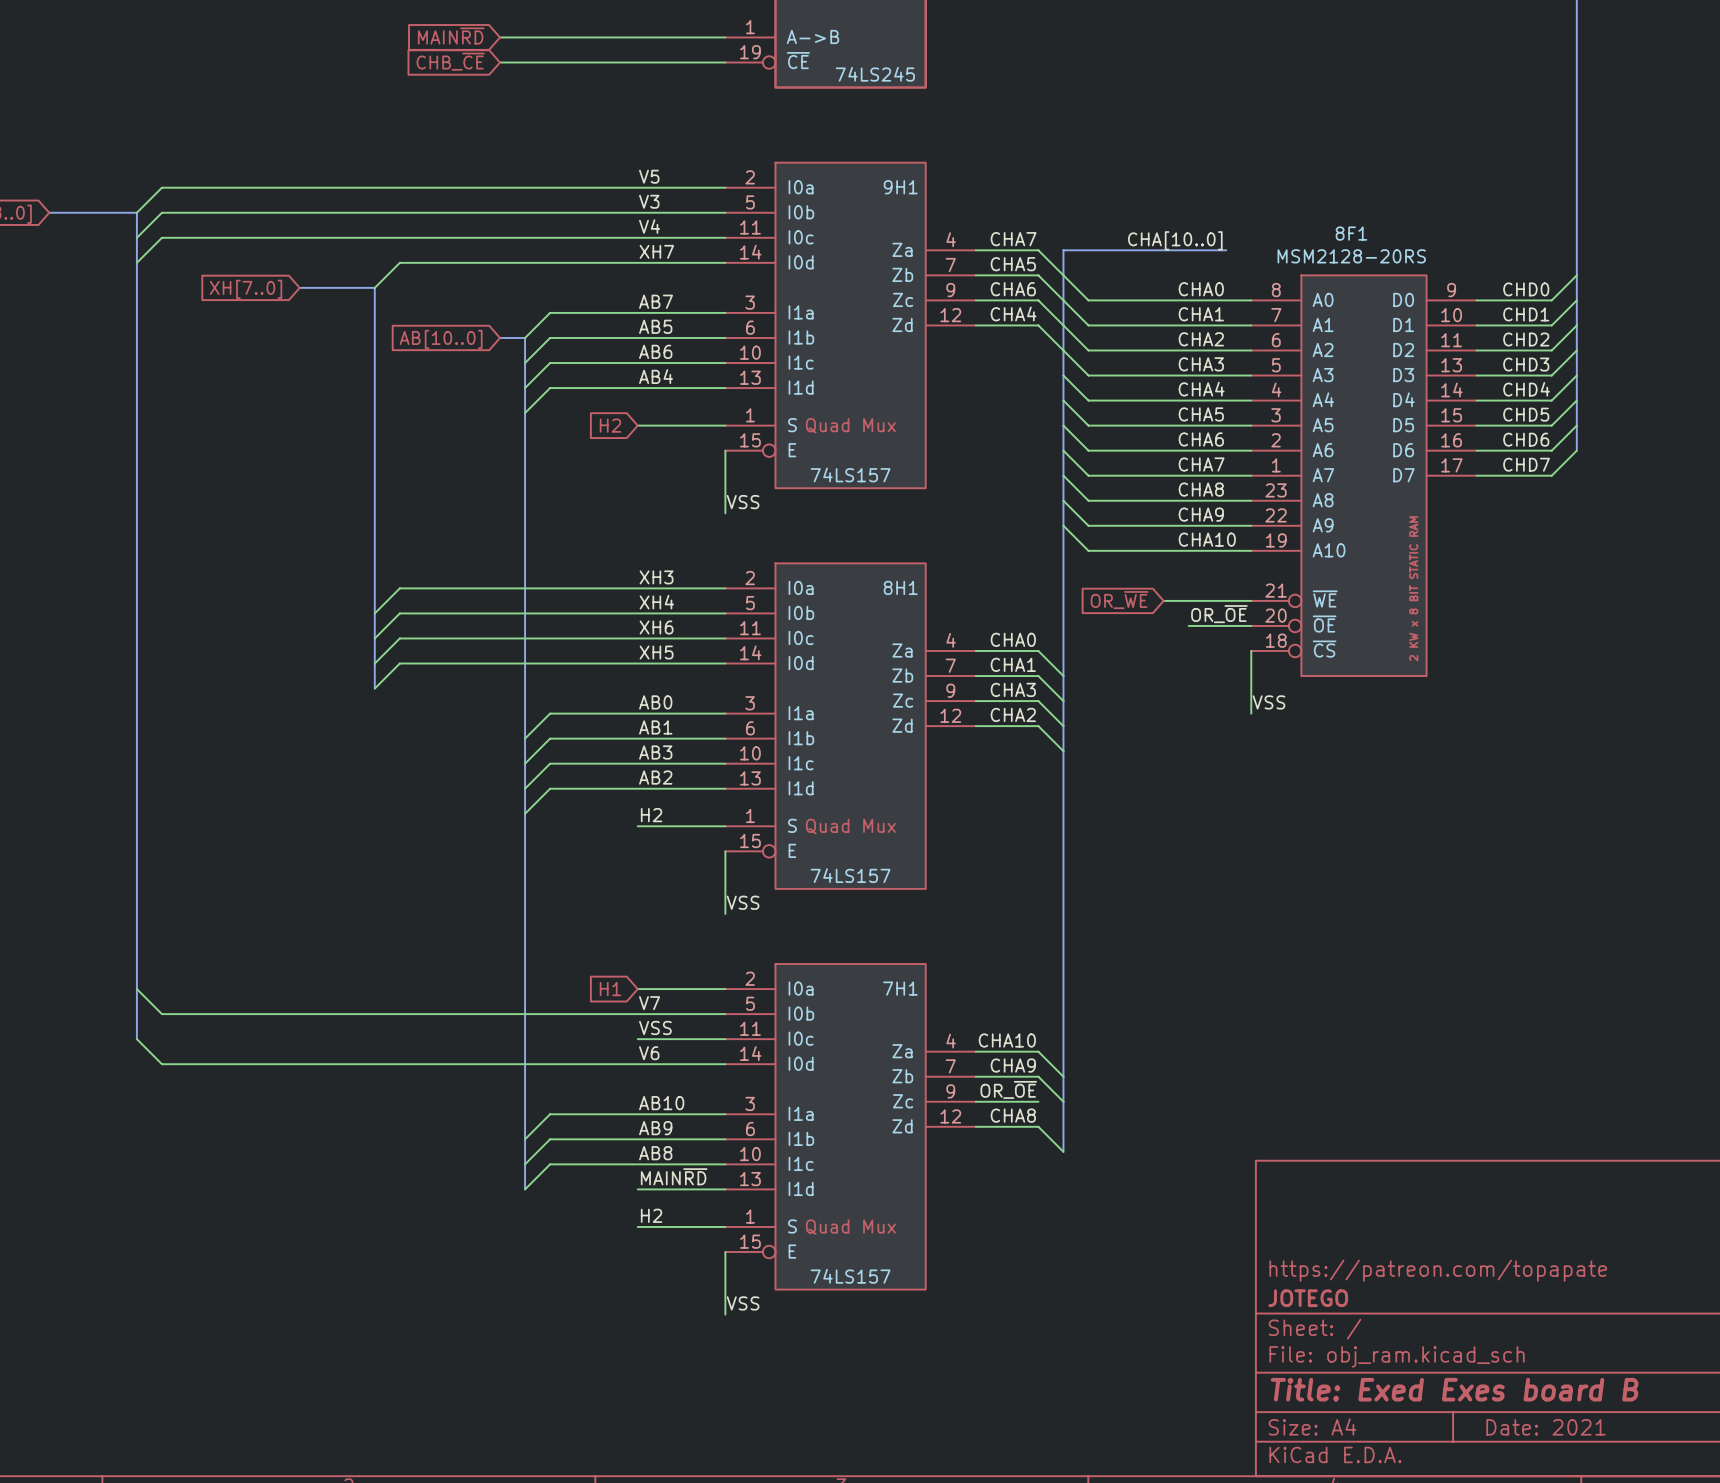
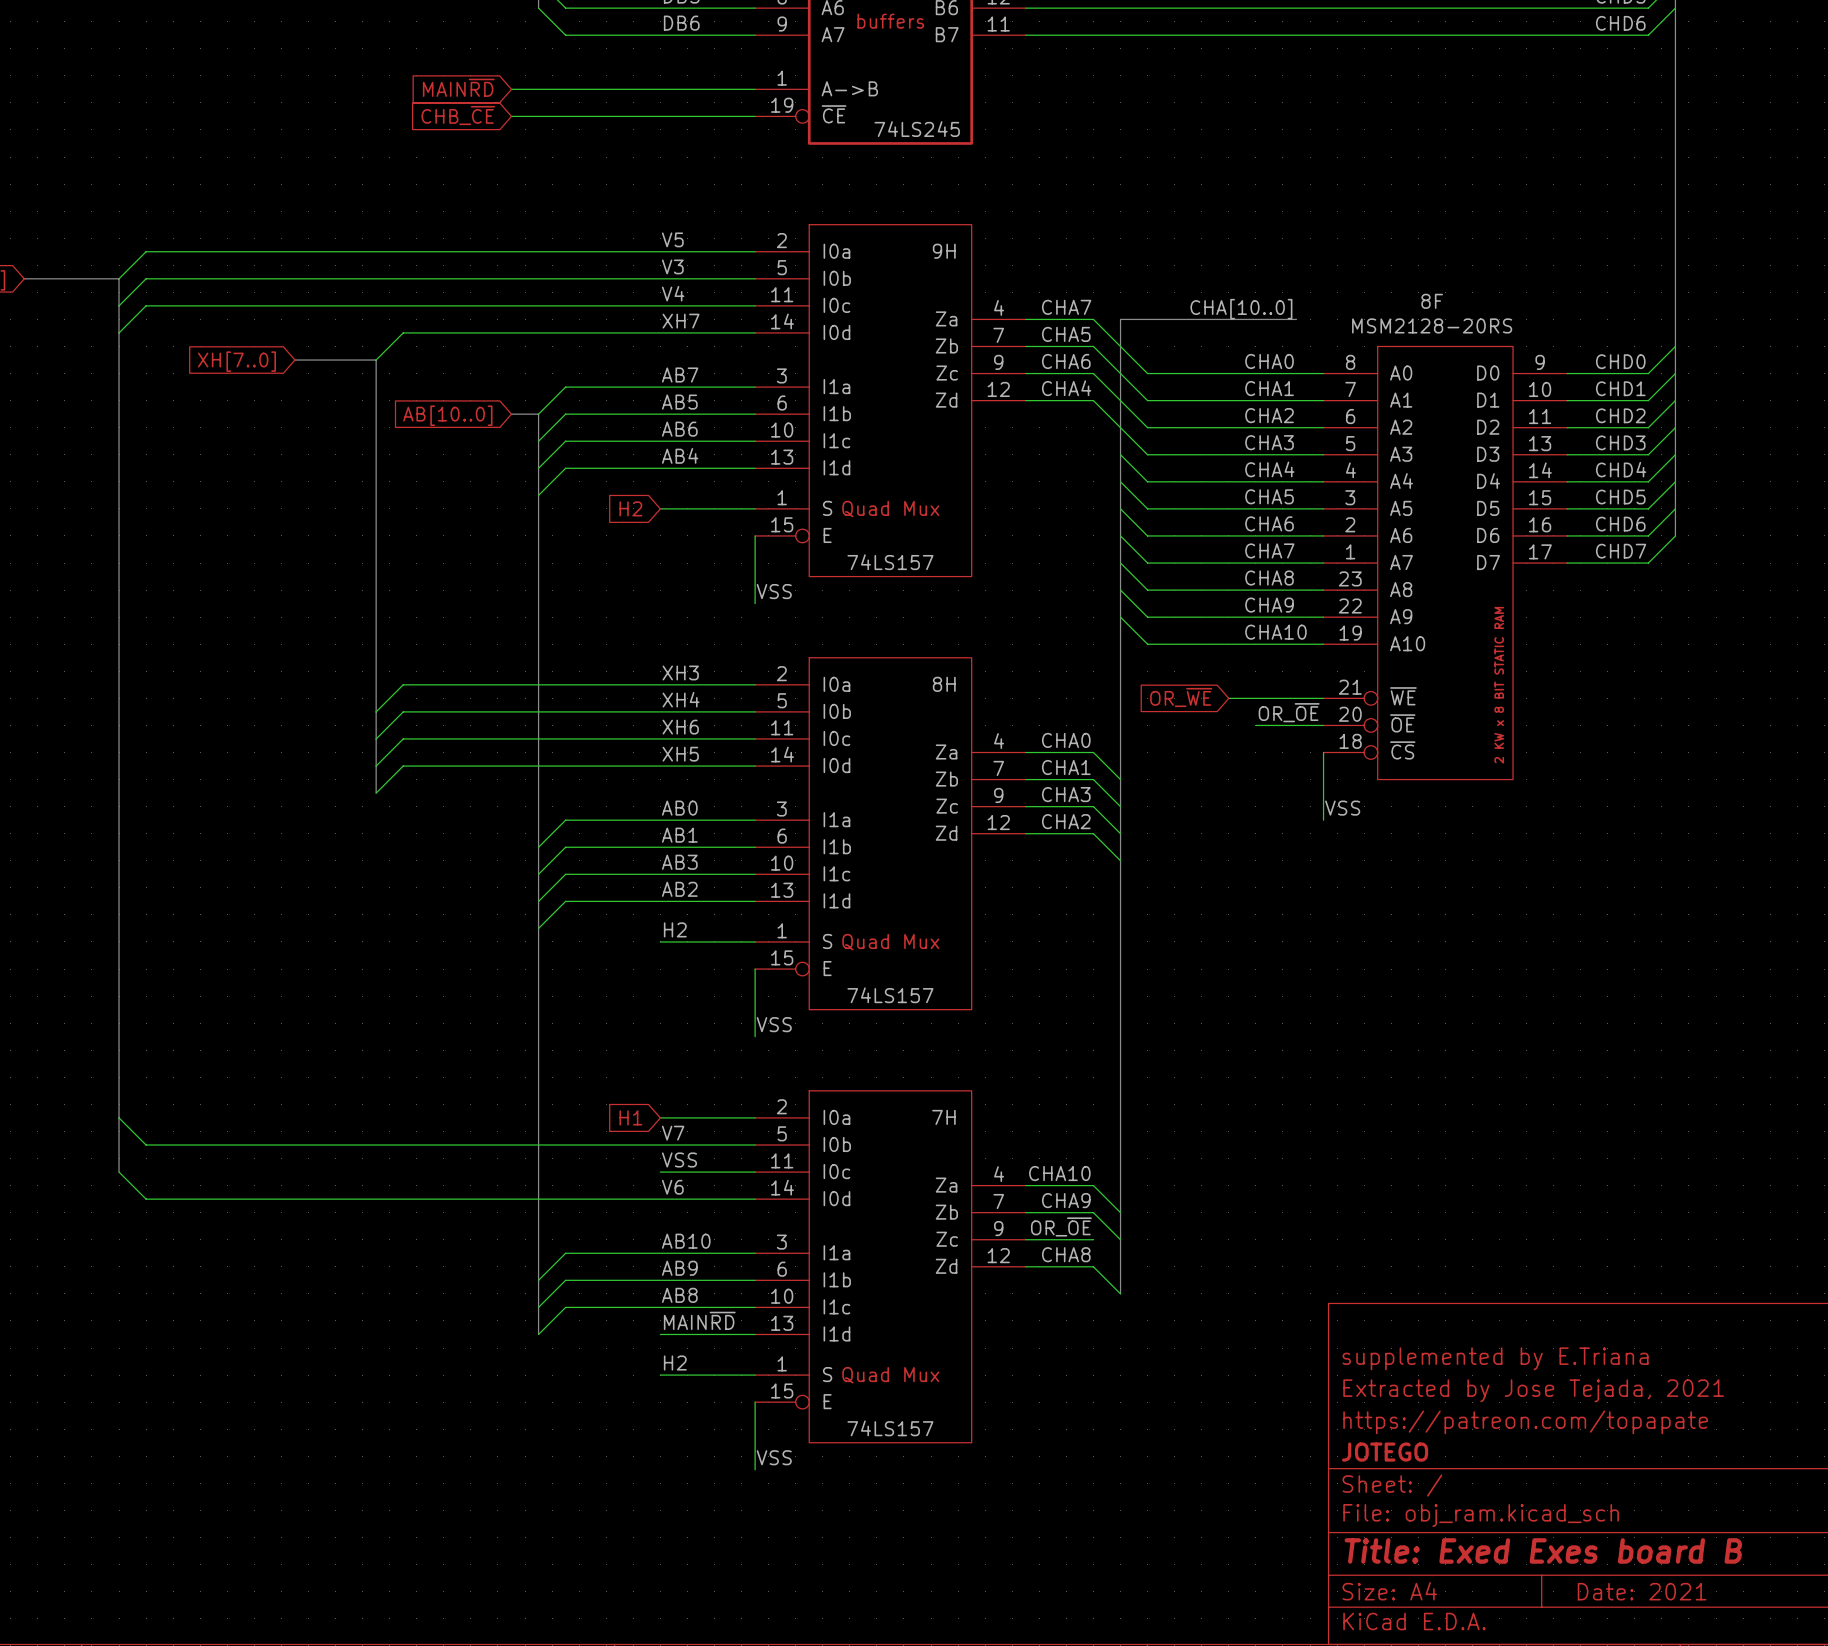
9H1 name: 9H1 (900, 187) -> 9H (944, 251)
8F1 name: 8F1 (1351, 233) -> 8F (1432, 301)
8H1 name: 8H1 (900, 587) -> 8H (944, 684)
7H1 name: 7H1 (900, 988) -> 7H (943, 1117)
title block: none -> supplemented by E.Triana (1495, 1358)
title block: none -> Extracted by Jose Tejada, 2021 (1533, 1390)

